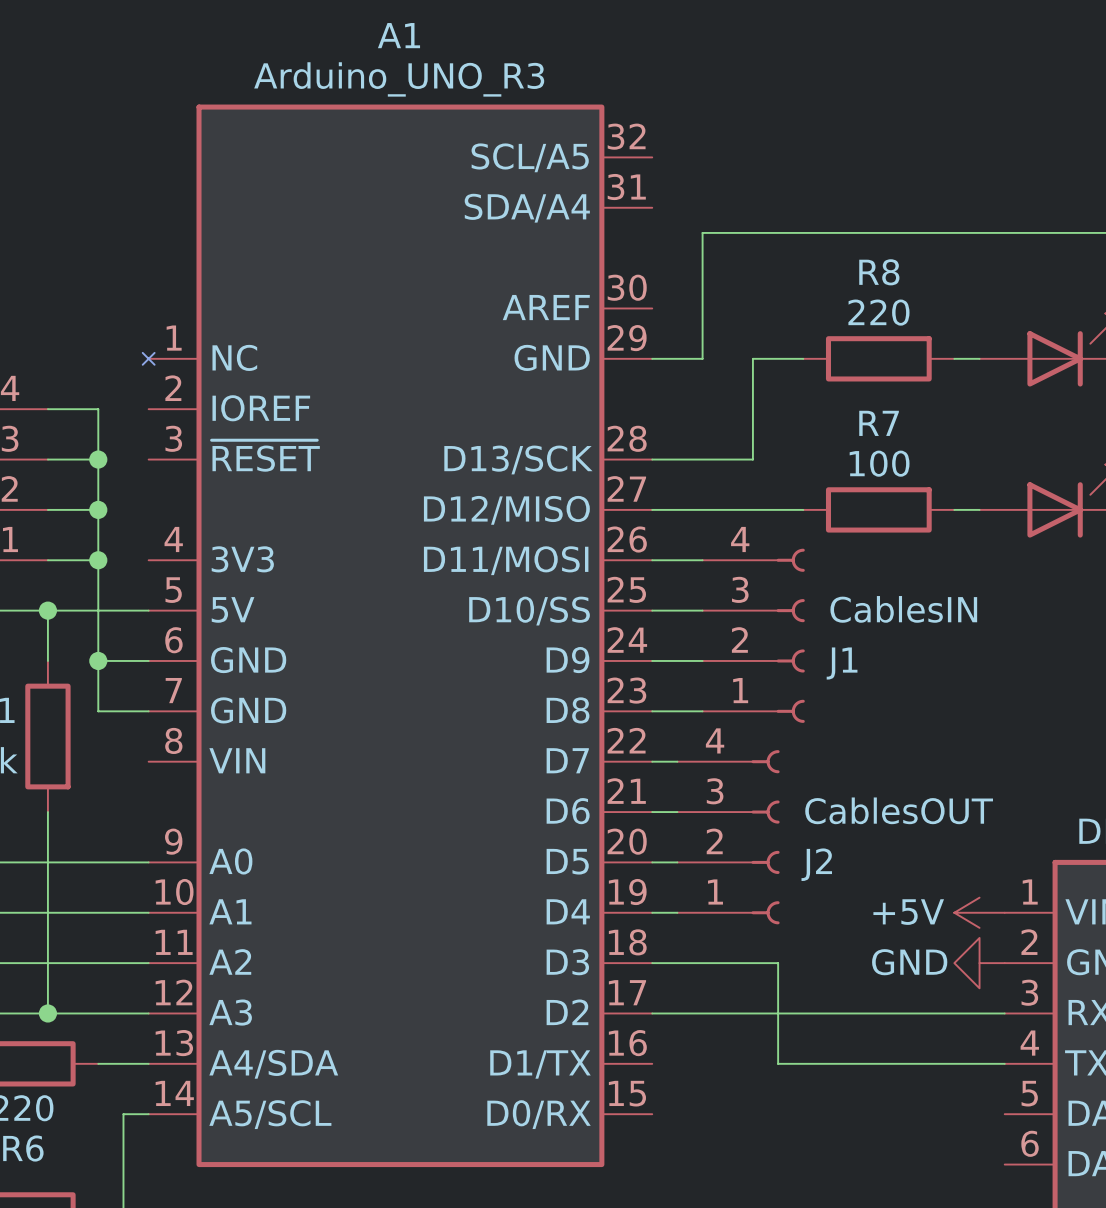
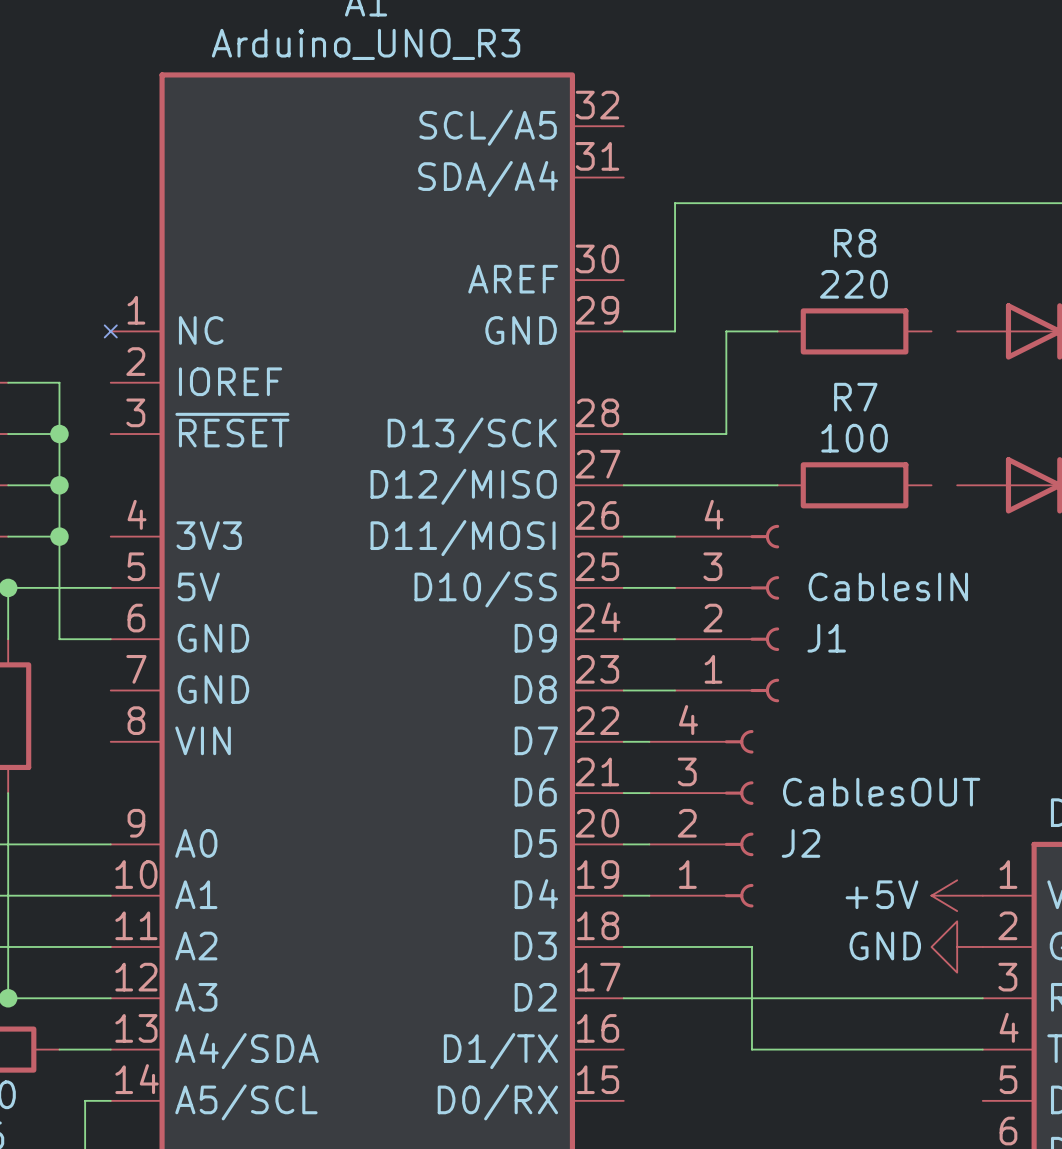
wire: (954, 358) (979, 358) -> none
wire: (954, 509) (979, 509) -> none
wire: (98, 660) (98, 711) (148, 711) -> none
junction: (98, 660) -> none

